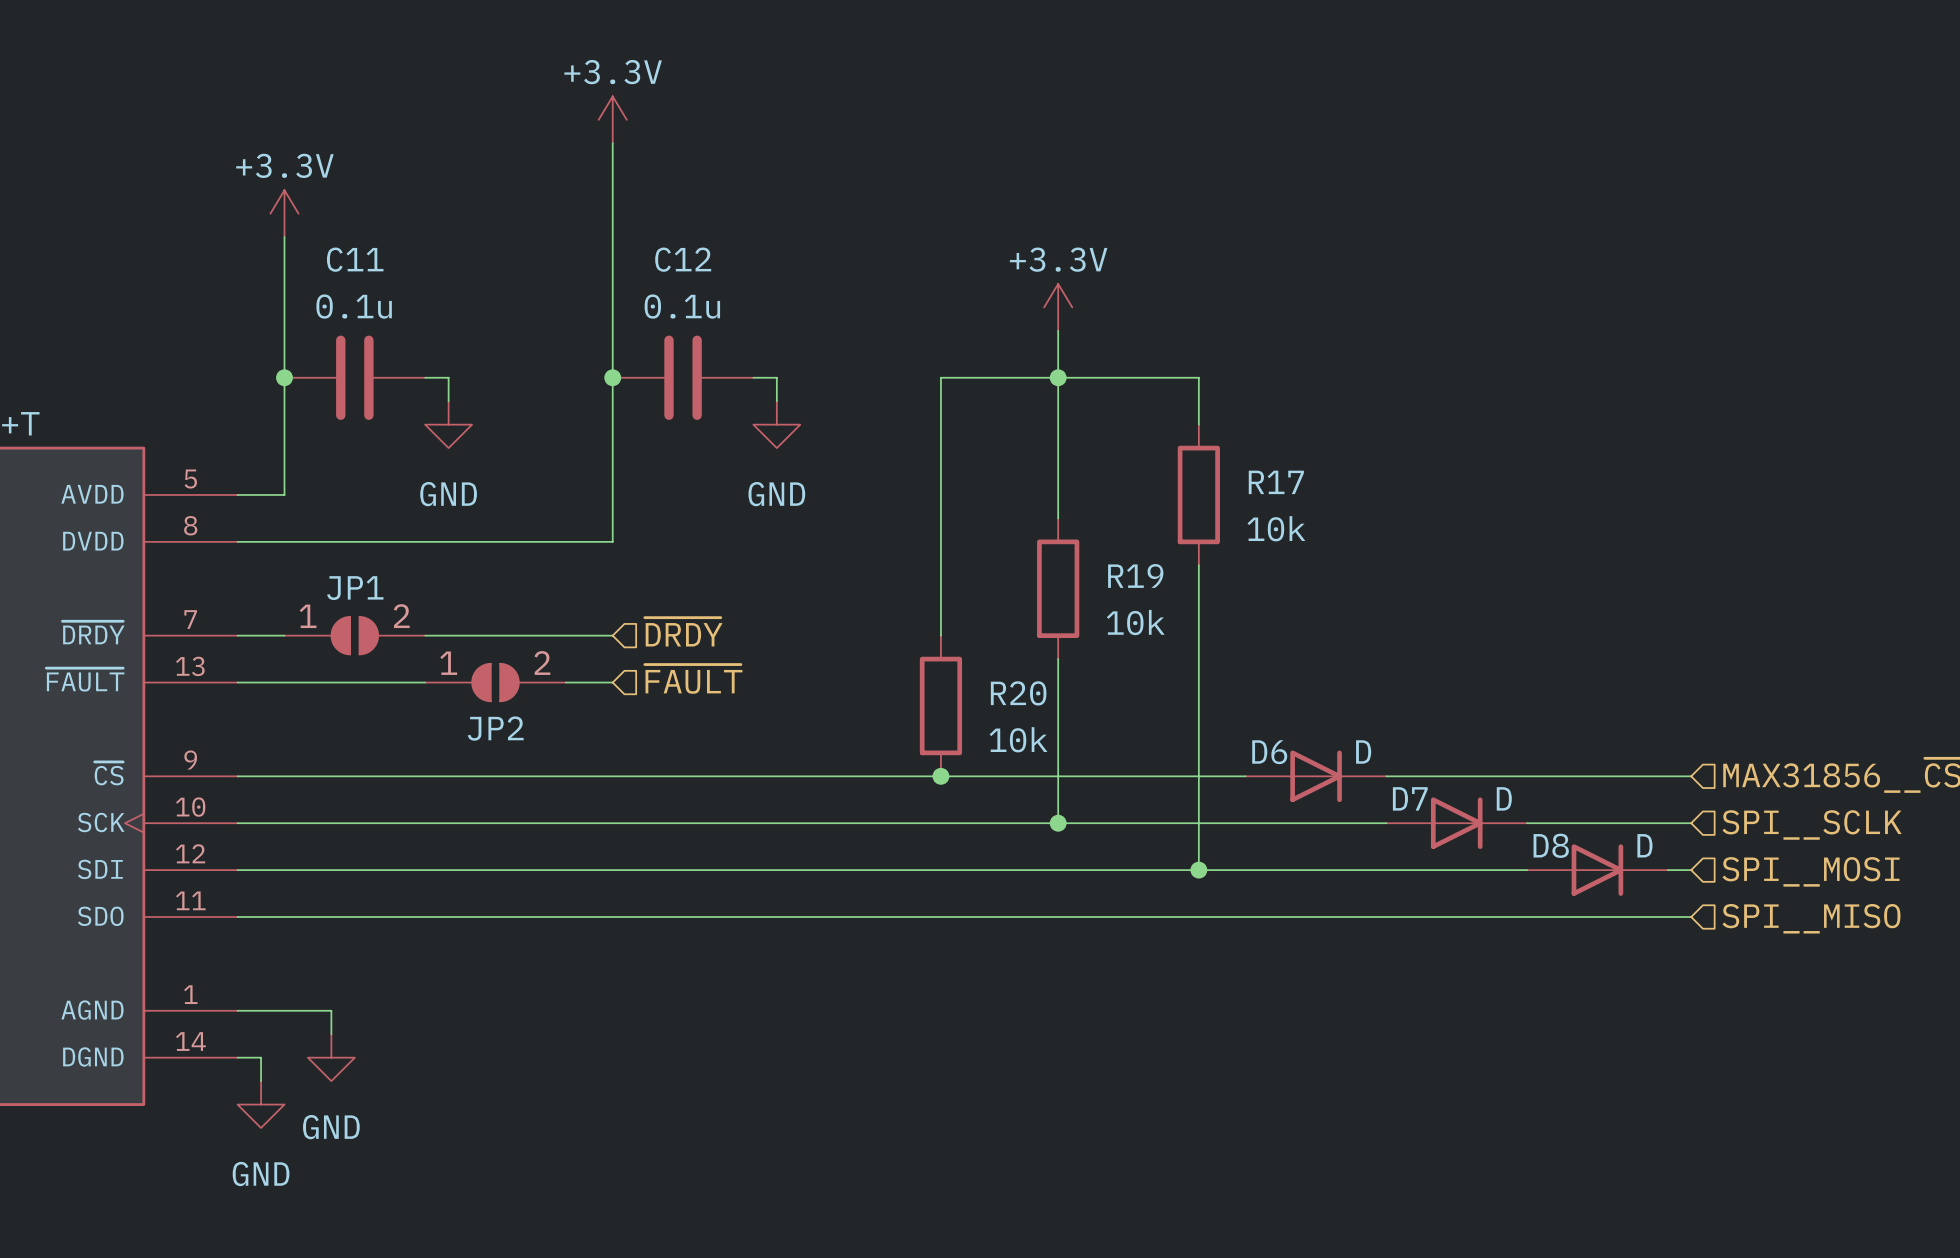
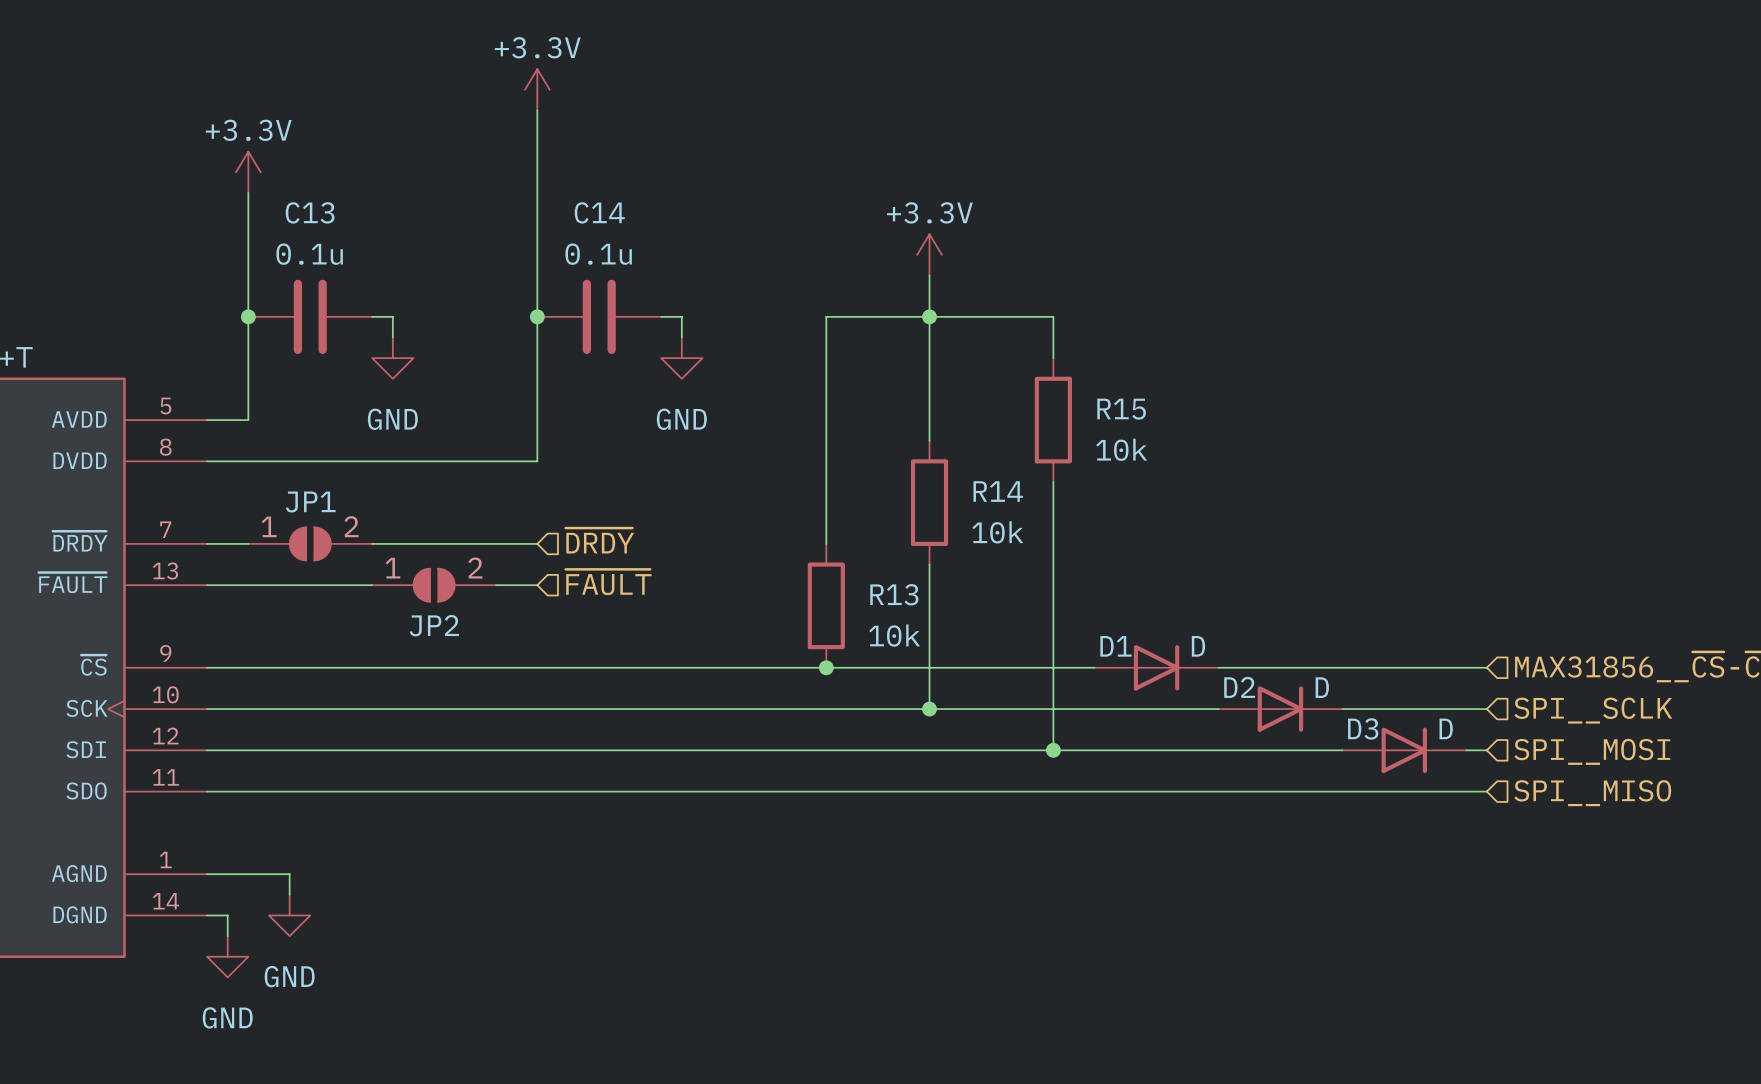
C11 name: C11 (355, 259) -> C13 (310, 212)
C12 name: C12 (683, 259) -> C14 (599, 212)
R17 name: R17 (1276, 482) -> R15 (1121, 409)
R19 name: R19 (1135, 575) -> R14 (998, 491)
R20 name: R20 (1018, 693) -> R13 (894, 594)
D6 name: D6 (1269, 752) -> D1 (1116, 646)
D7 name: D7 (1410, 798) -> D2 (1239, 687)
D8 name: D8 (1551, 845) -> D3 (1363, 728)

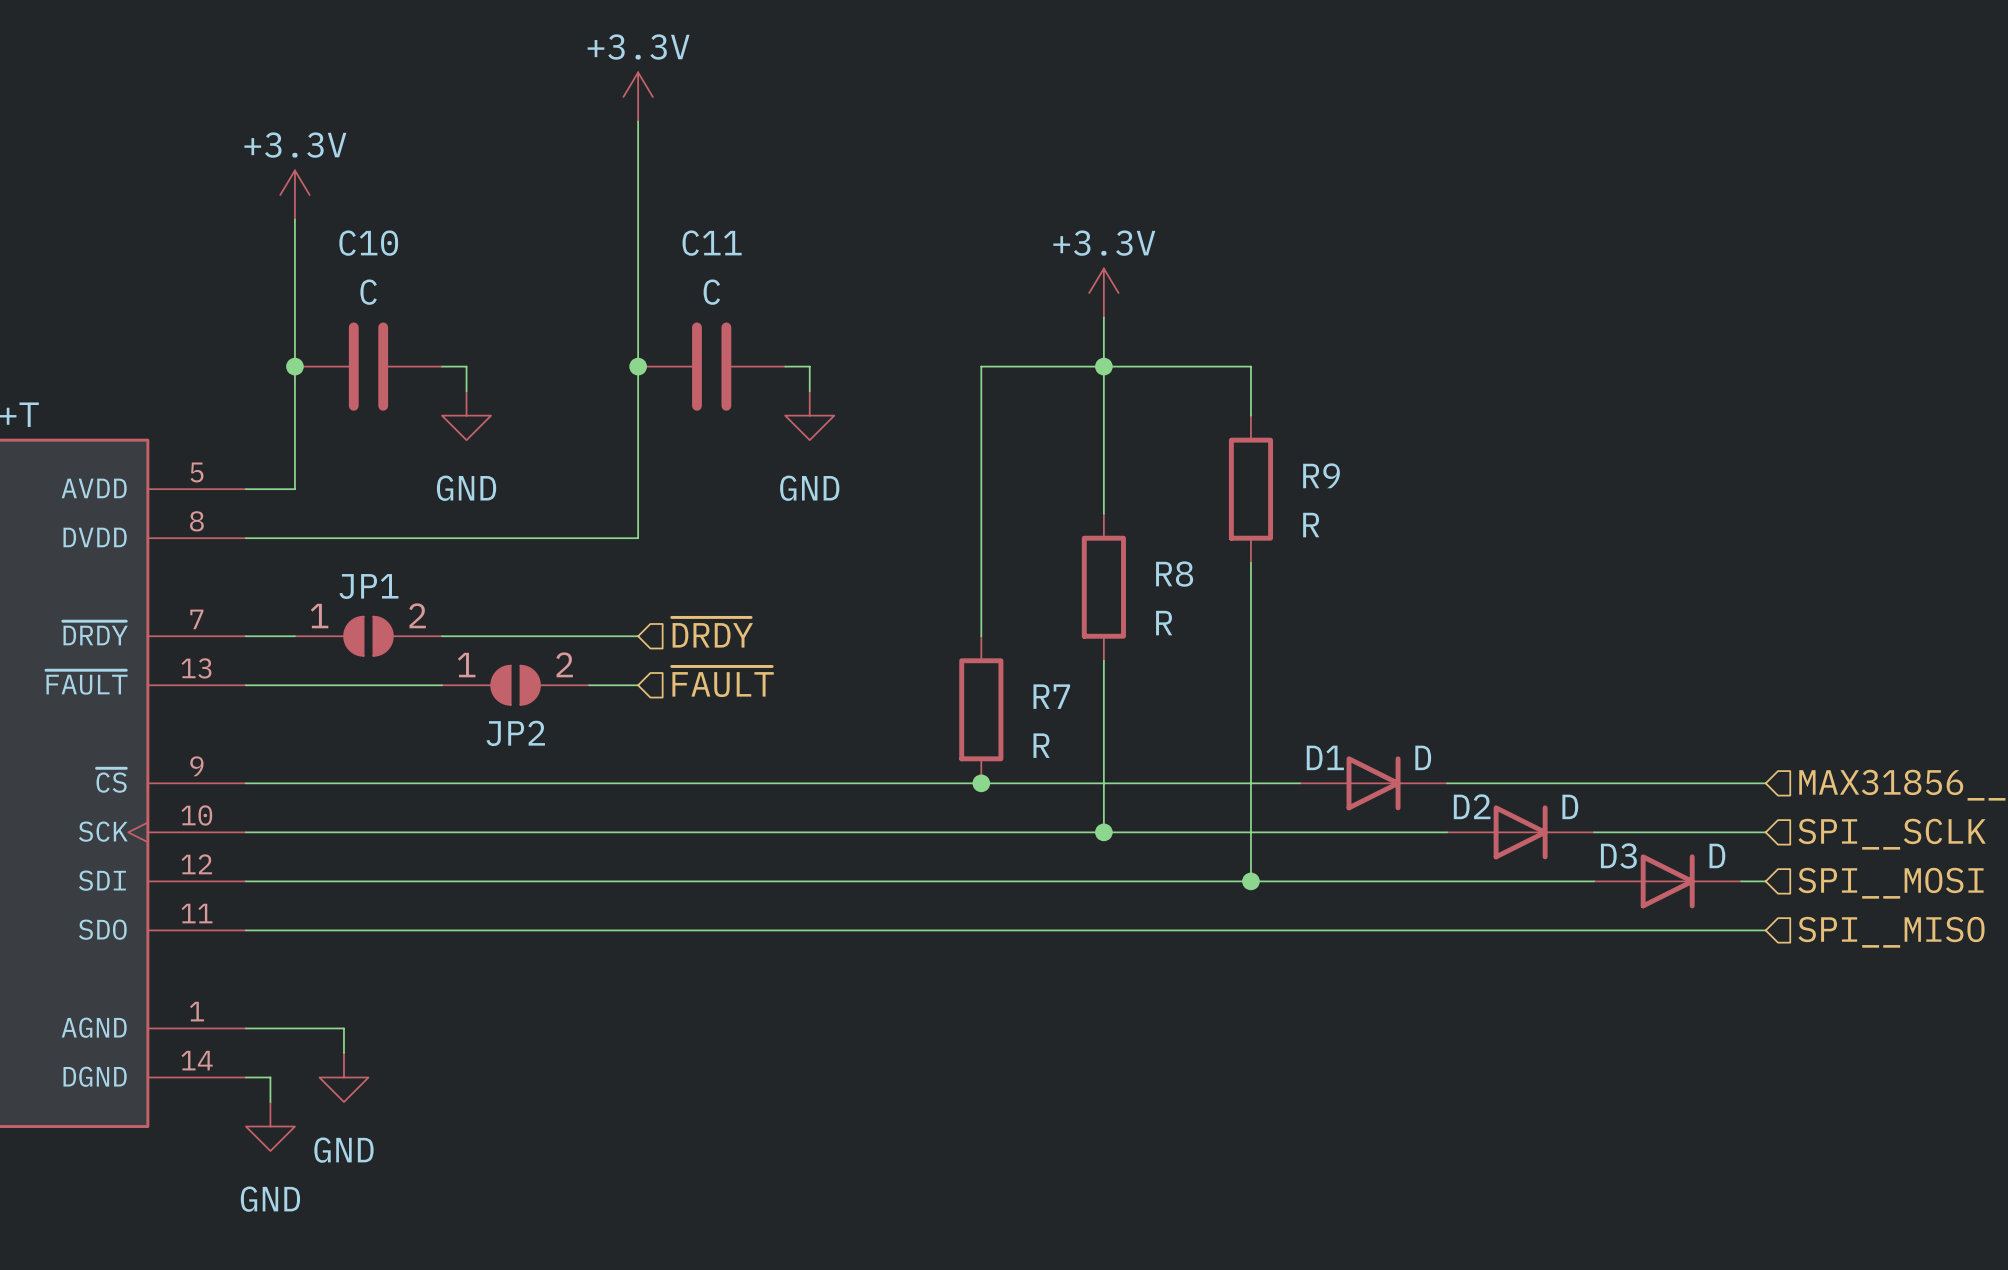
C13 name: C13 (310, 212) -> C10 (368, 243)
C14 name: C14 (599, 212) -> C11 (712, 243)
C13 value: 0.1u (309, 254) -> C (368, 292)
C14 value: 0.1u (598, 254) -> C (711, 292)
R15 name: R15 (1121, 409) -> R9 (1321, 475)
R15 value: 10k (1121, 449) -> R (1311, 525)
R14 name: R14 (998, 491) -> R8 (1174, 574)
R14 value: 10k (997, 532) -> R (1164, 623)
R13 name: R13 (894, 594) -> R7 (1051, 696)
R13 value: 10k (894, 635) -> R (1041, 745)

